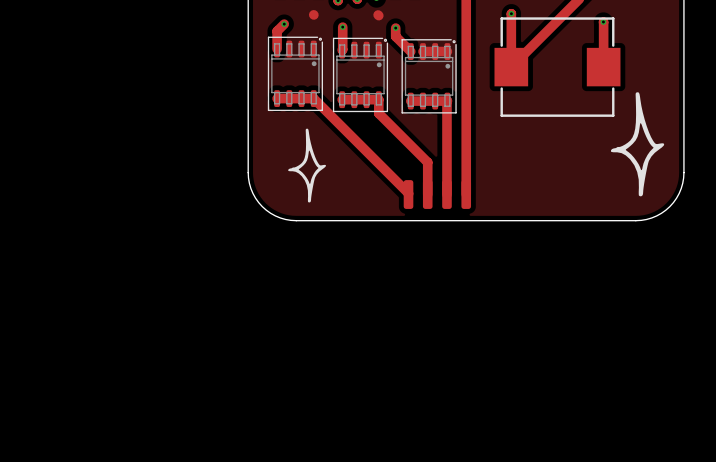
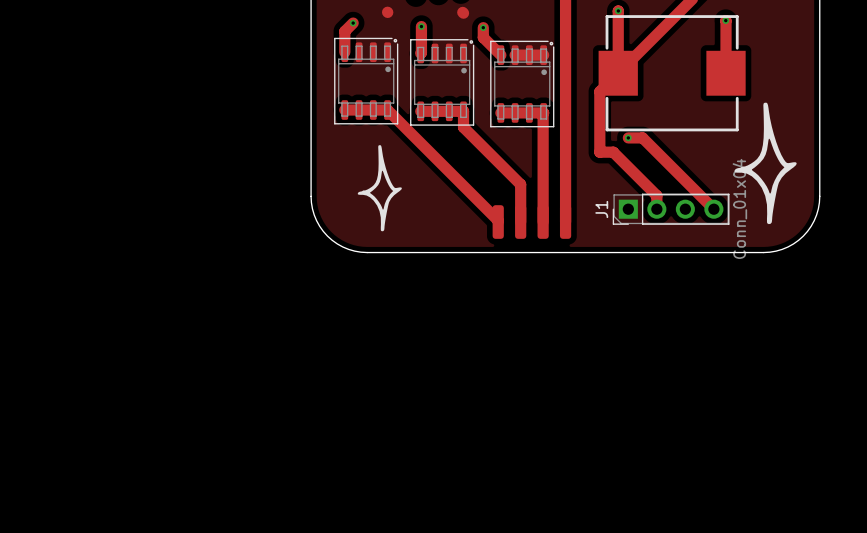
track: none -> (618, 73) (599, 91) (599, 152) (613, 152) (656, 195) (656, 209)
track: none -> (628, 137) (642, 137) (713, 209)
via: none -> (628, 137)
J1: none -> Conn_01x04 (671, 209)

